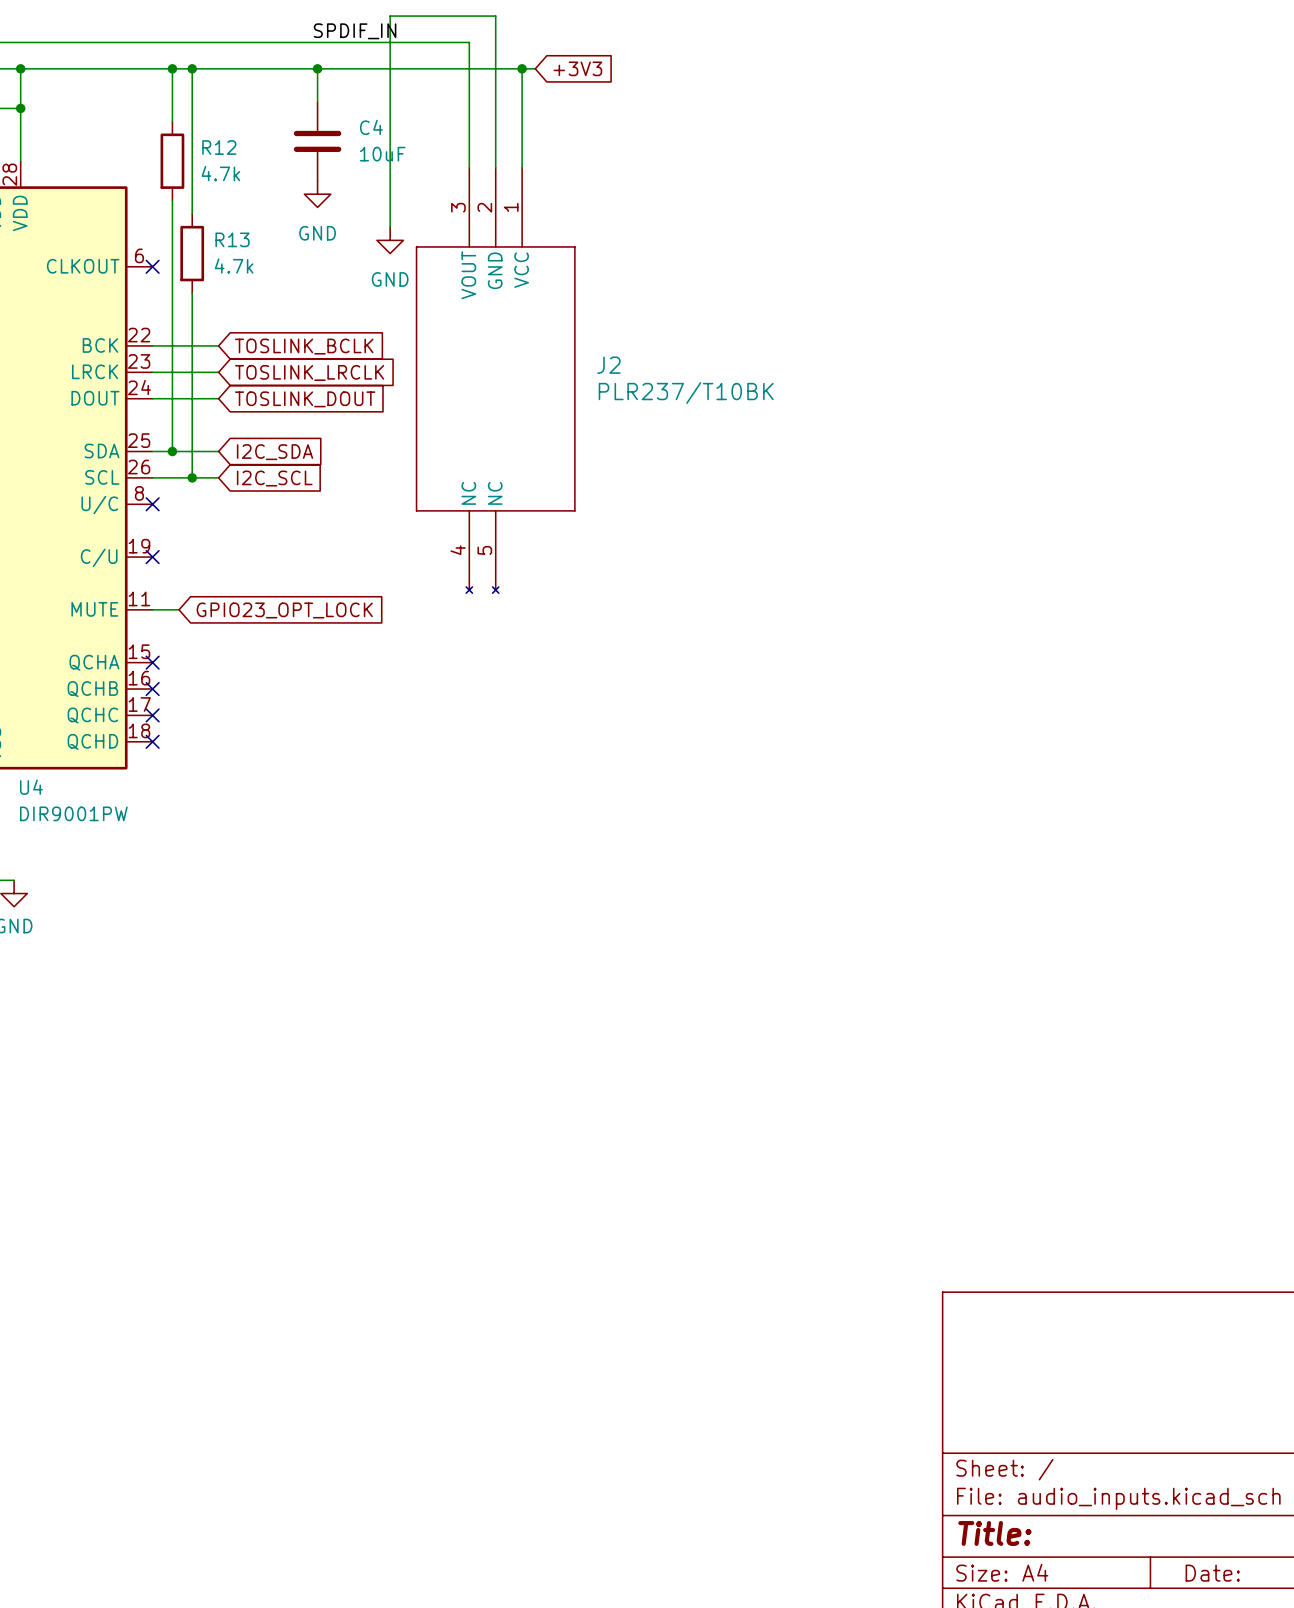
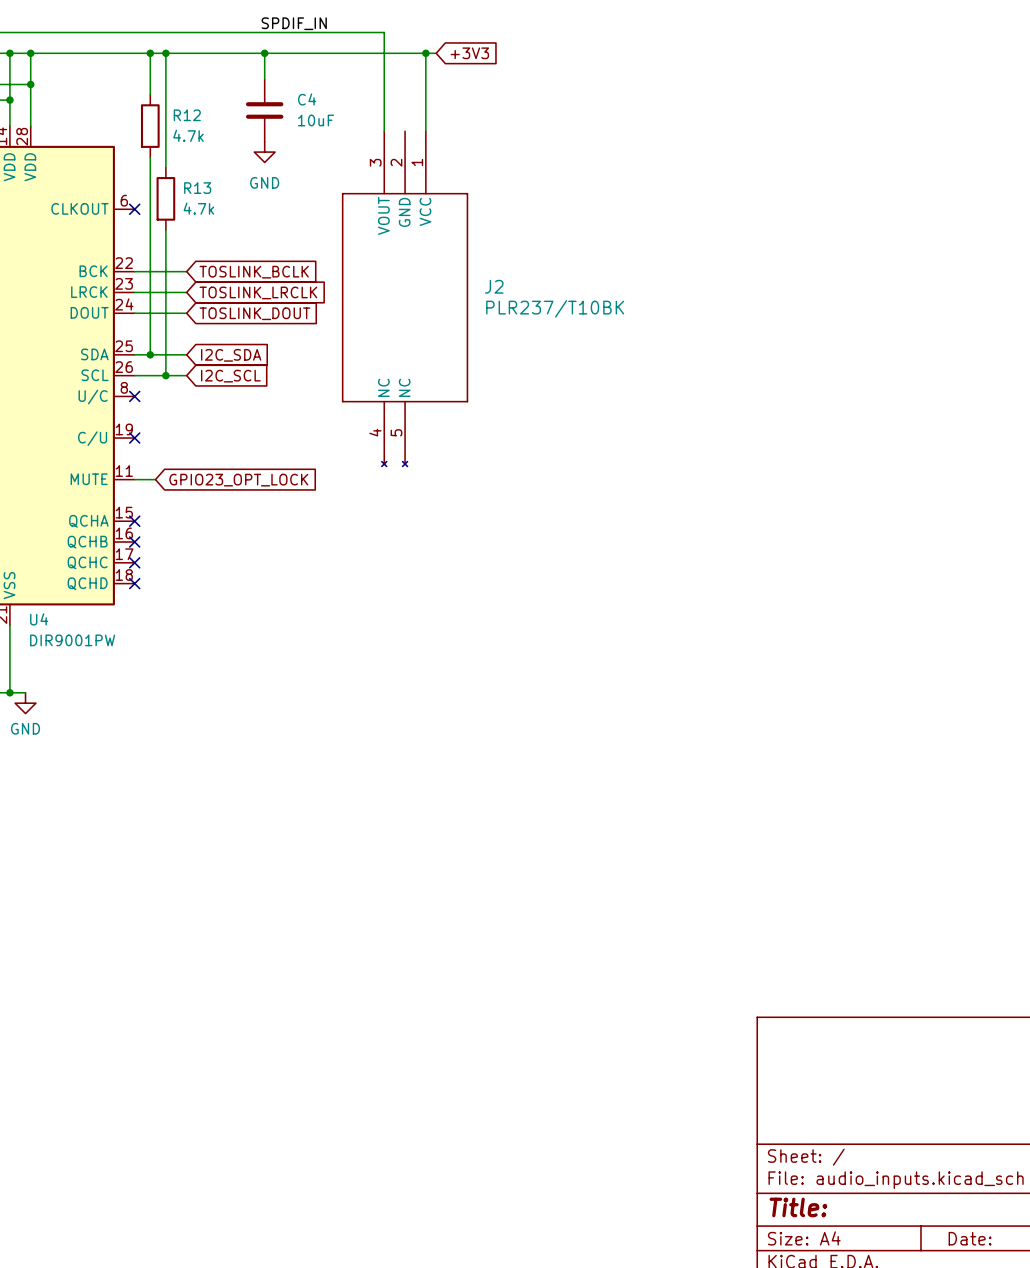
wire: (495, 167) (495, 16) (390, 16) (390, 227) -> none
power symbol: GND (390, 240) -> none

